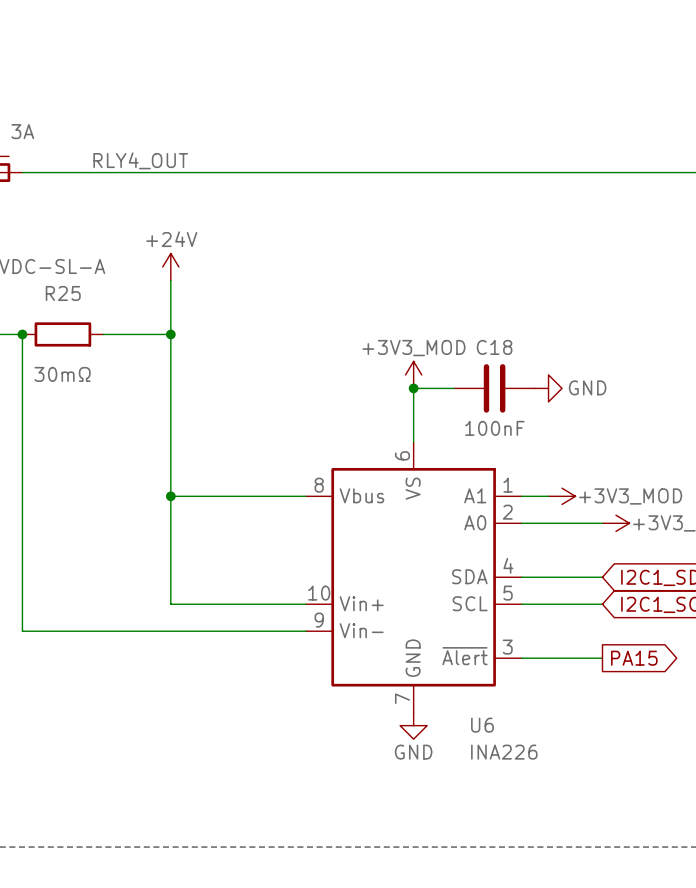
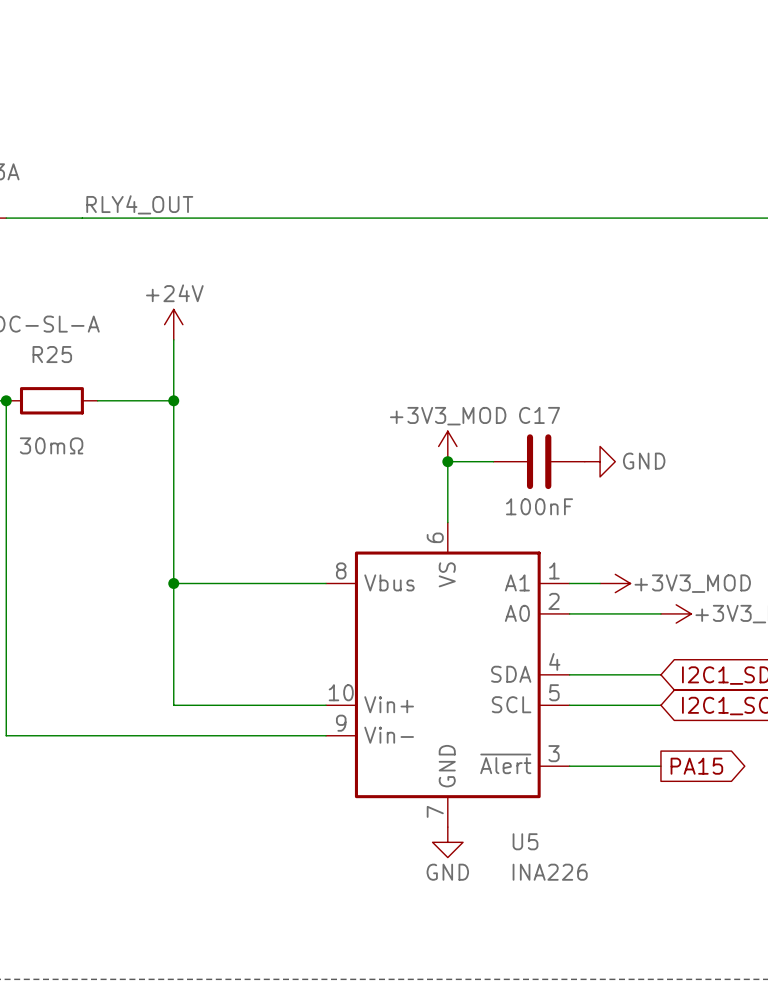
C18 name: C18 (494, 347) -> C17 (539, 415)
U6 name: U6 (482, 725) -> U5 (525, 841)

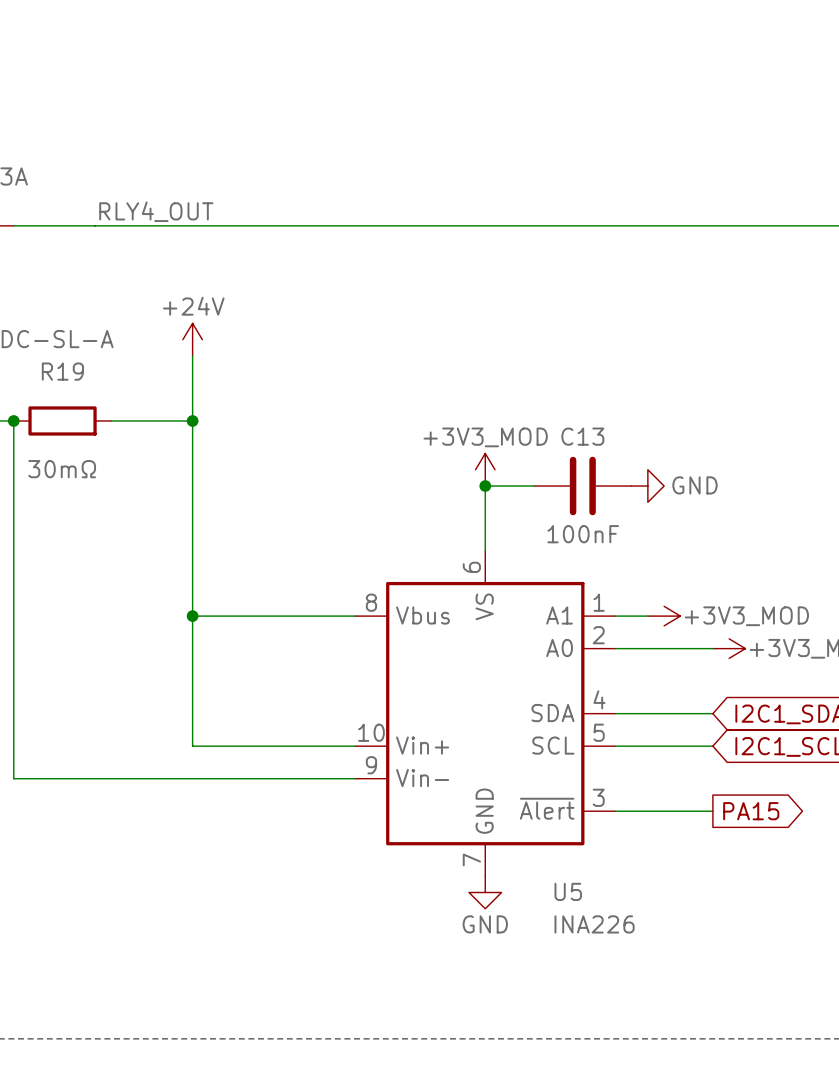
R25 name: R25 (52, 354) -> R19 (62, 371)
C17 name: C17 (539, 415) -> C13 (582, 436)

